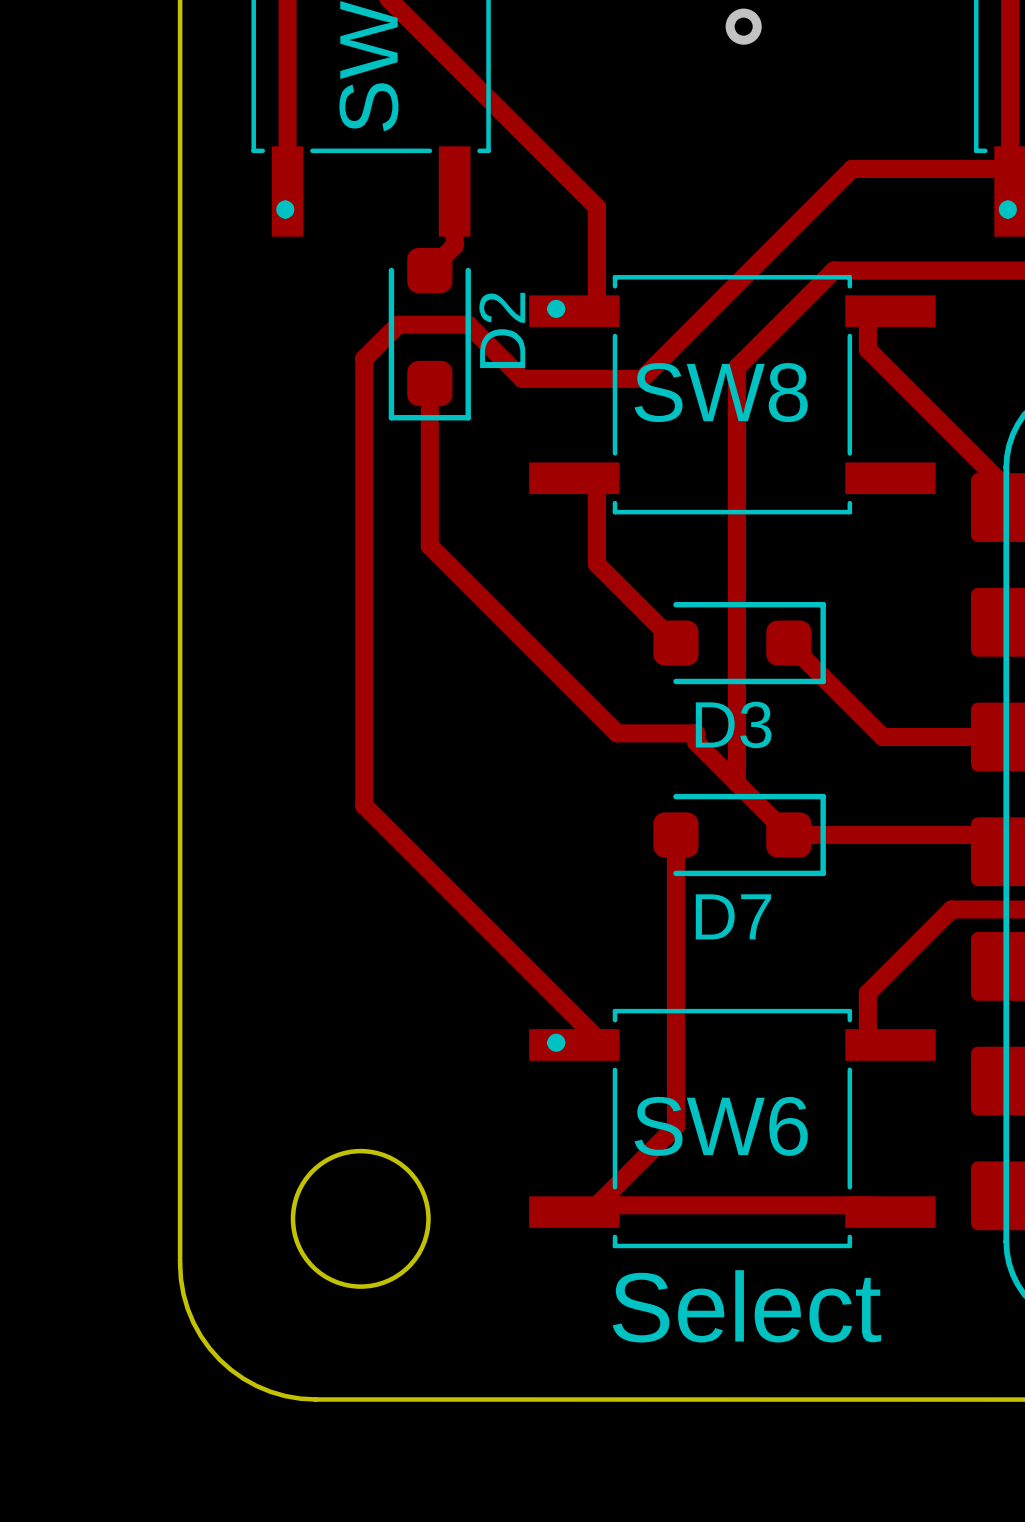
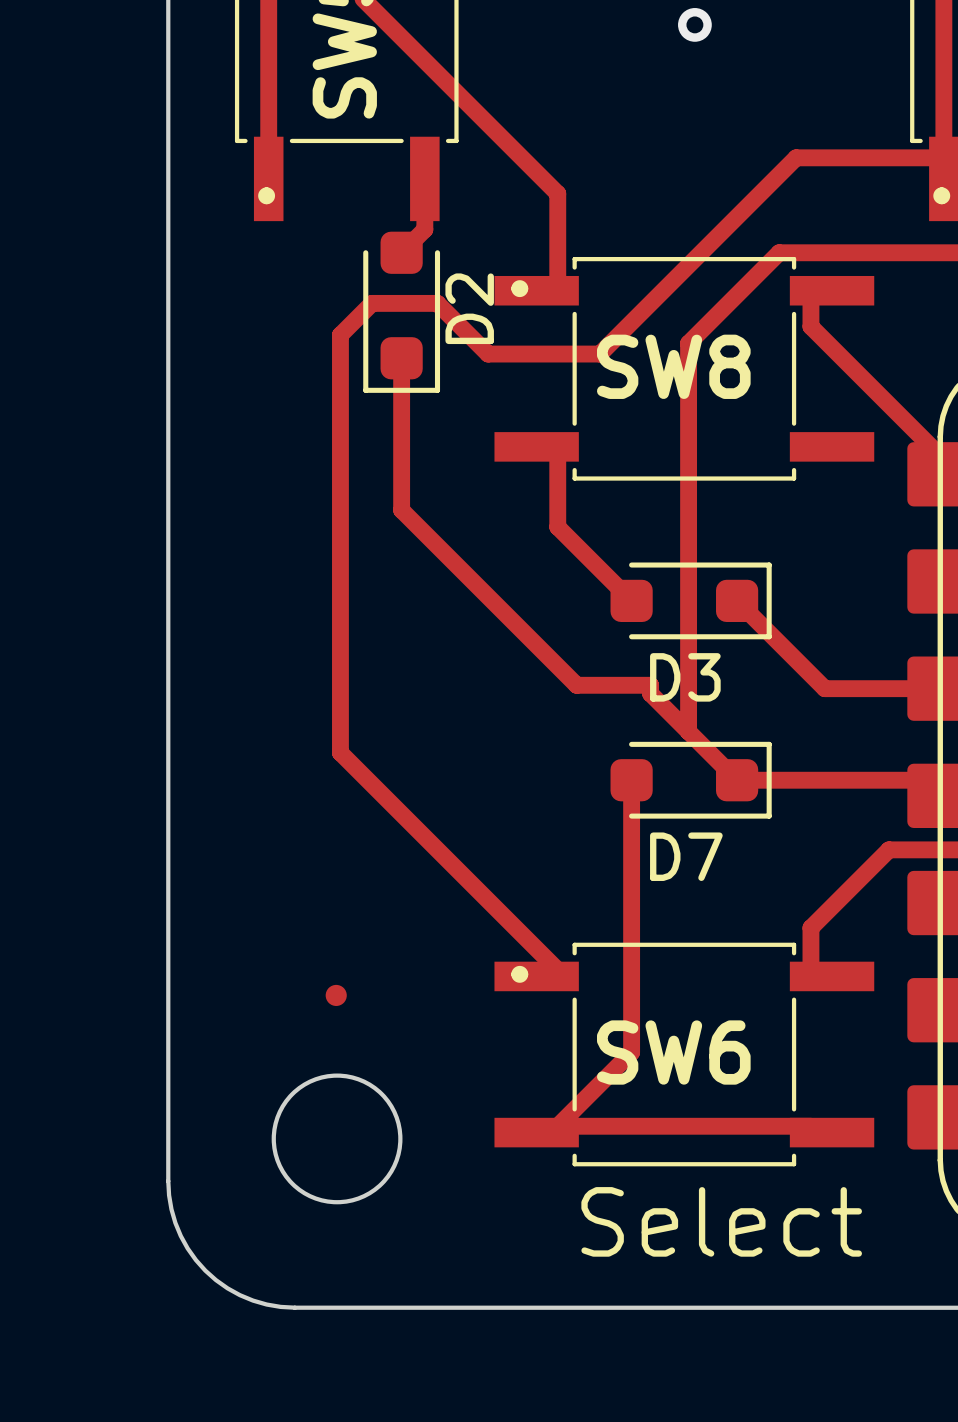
part: none -> (336, 995)

